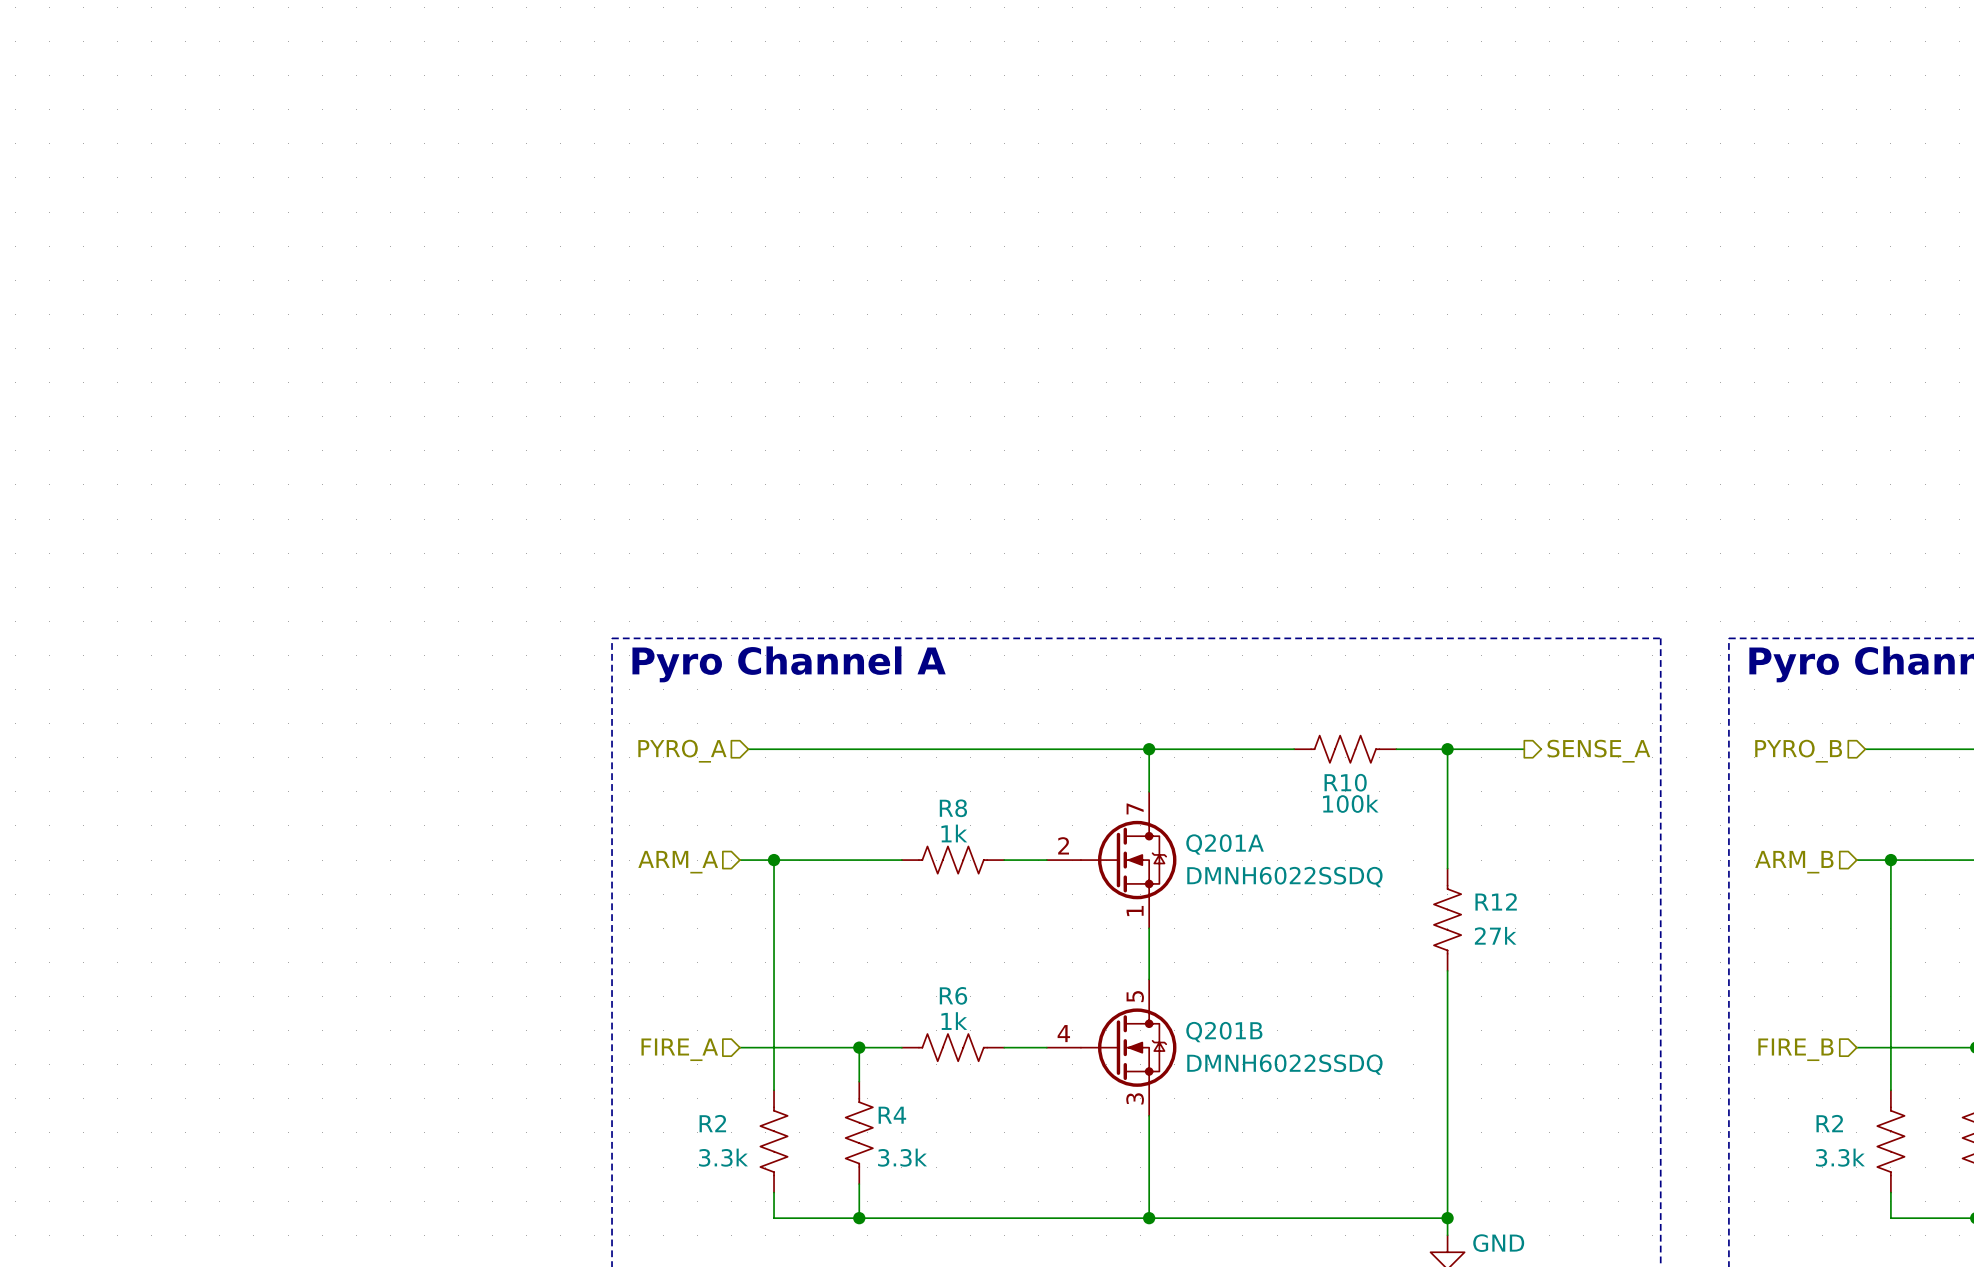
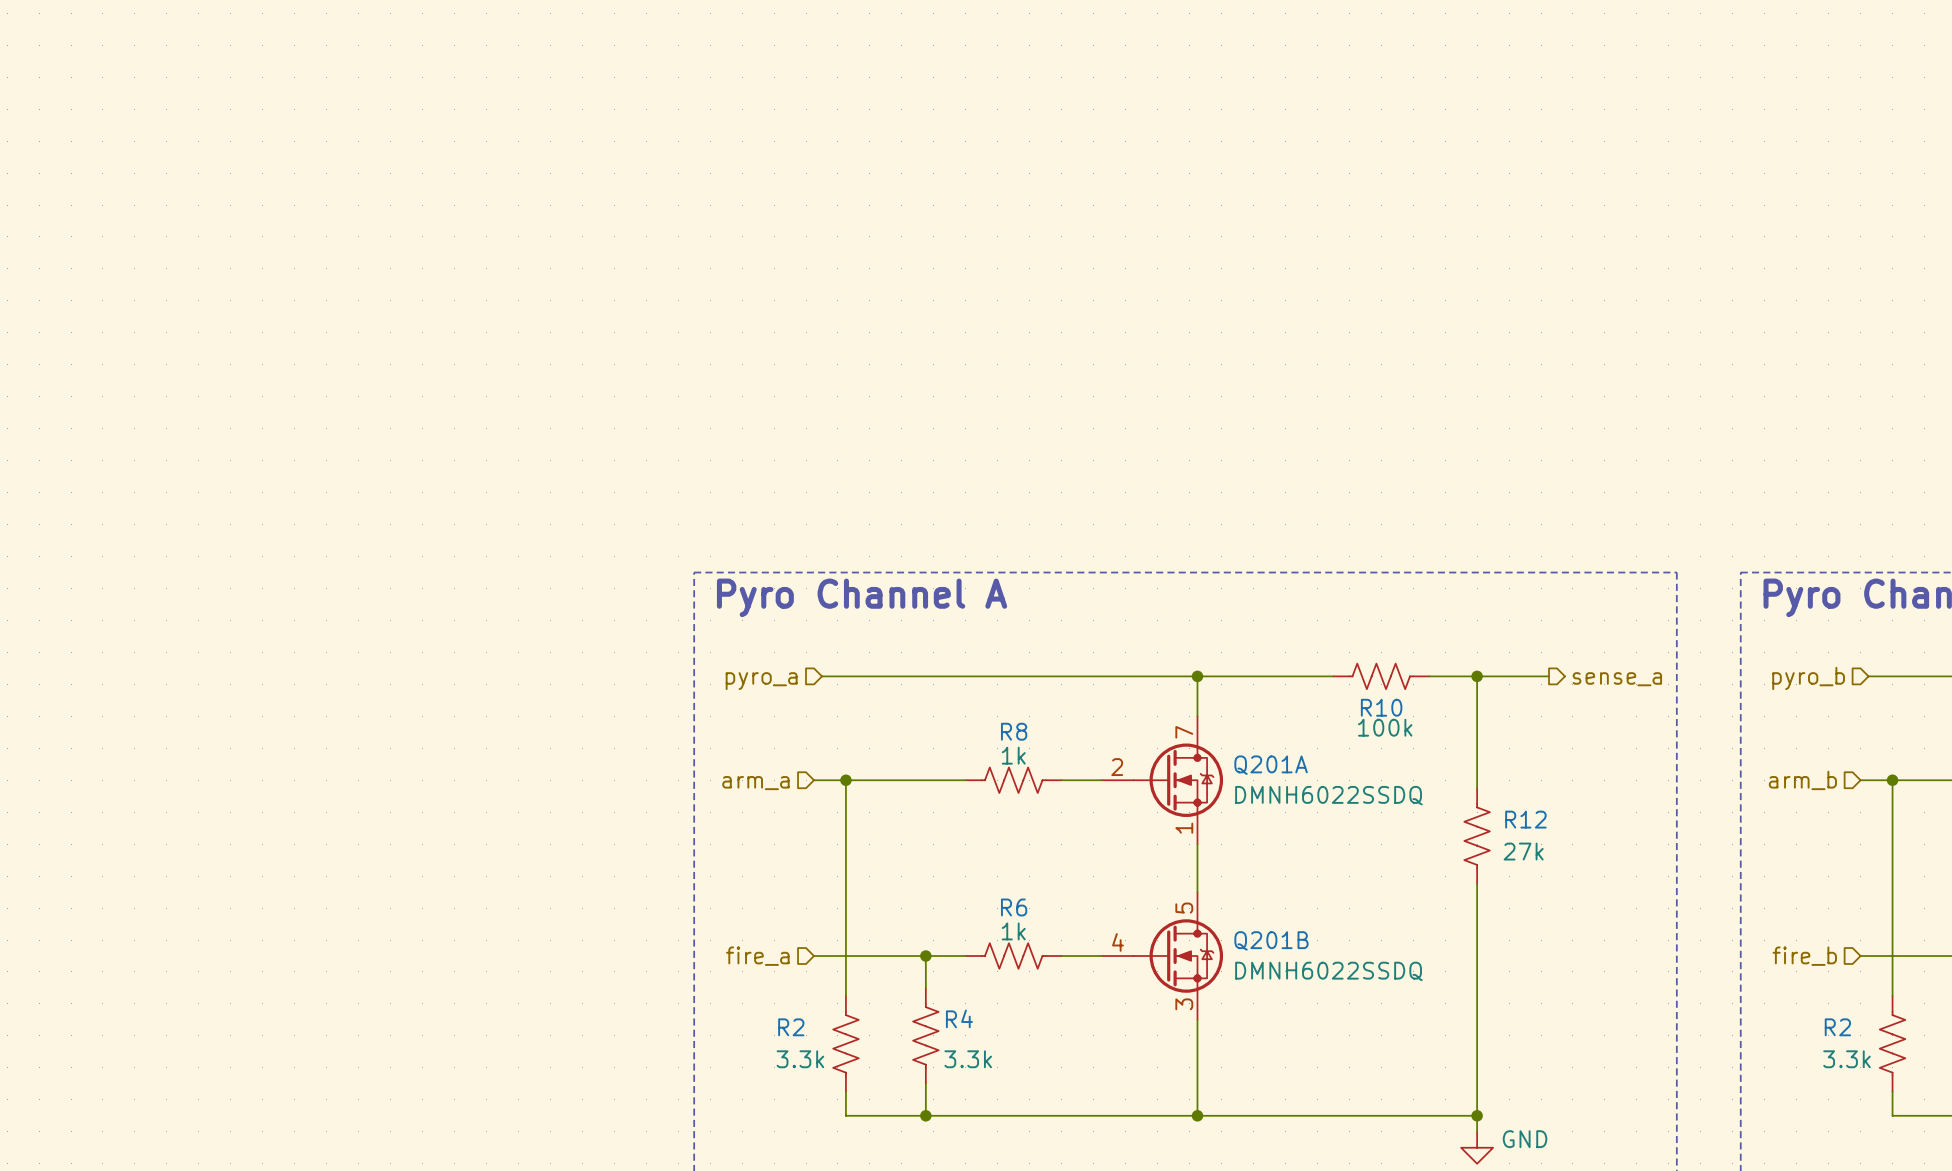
hierarchical label: PYRO_A (682, 751) -> pyro_a (761, 681)
hierarchical label: SENSE_A (1598, 751) -> sense_a (1617, 679)
hierarchical label: PYRO_B (1798, 751) -> pyro_b (1808, 678)
hierarchical label: ARM_A (678, 862) -> arm_a (755, 783)
hierarchical label: ARM_B (1794, 862) -> arm_b (1802, 780)
hierarchical label: FIRE_A (679, 1049) -> fire_a (757, 956)
hierarchical label: FIRE_B (1795, 1049) -> fire_b (1804, 956)

